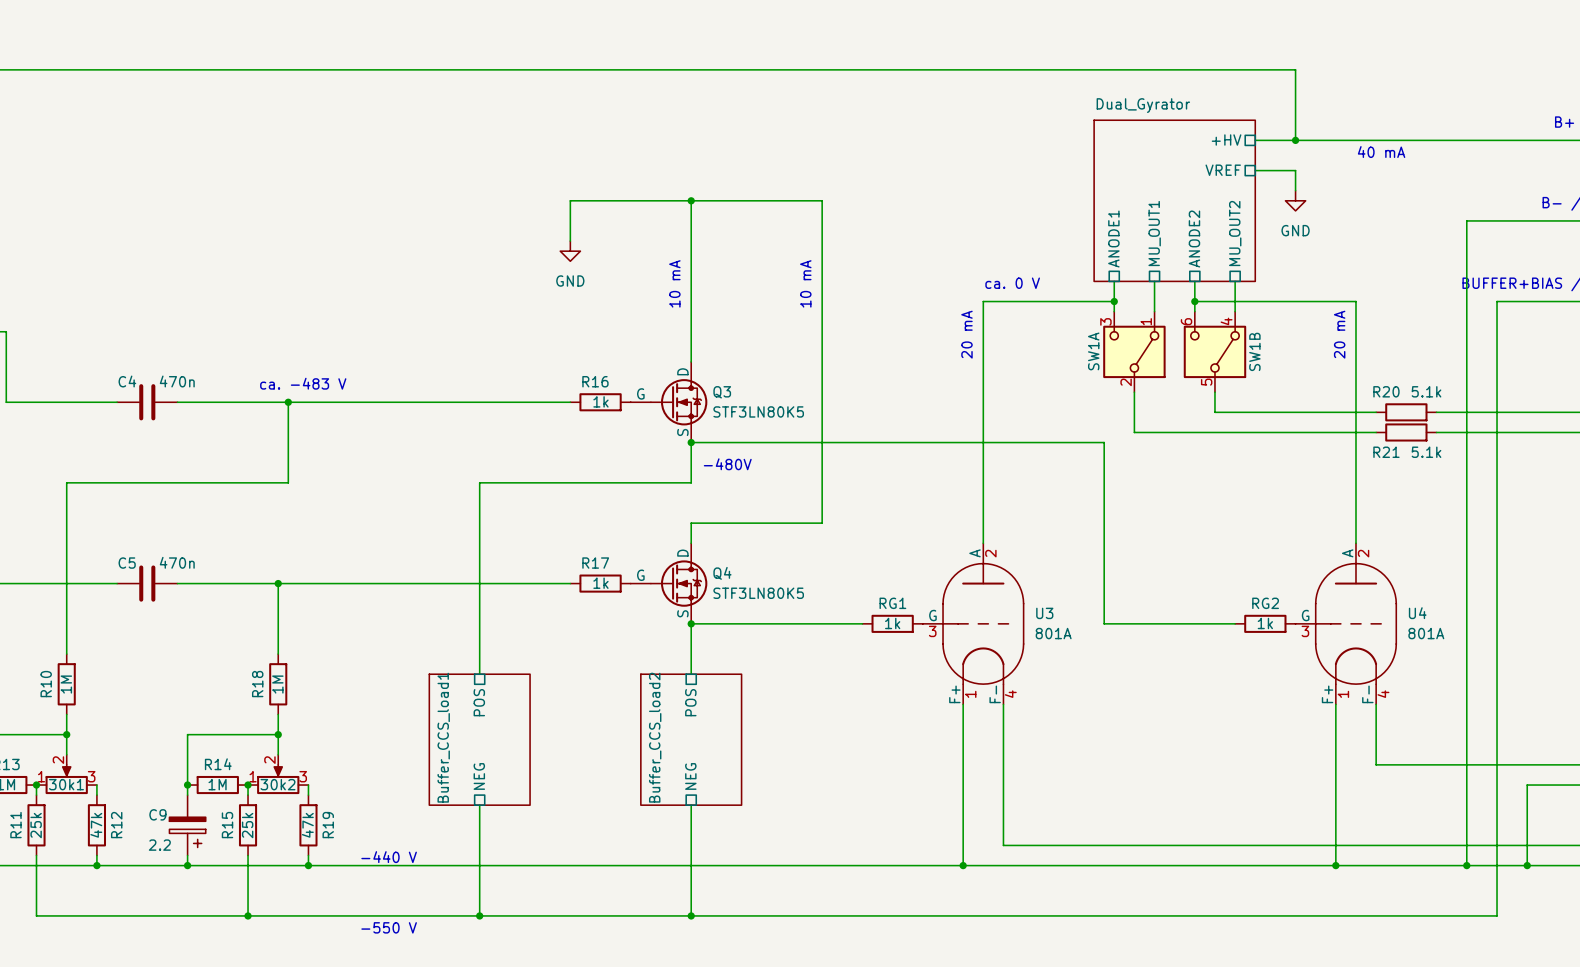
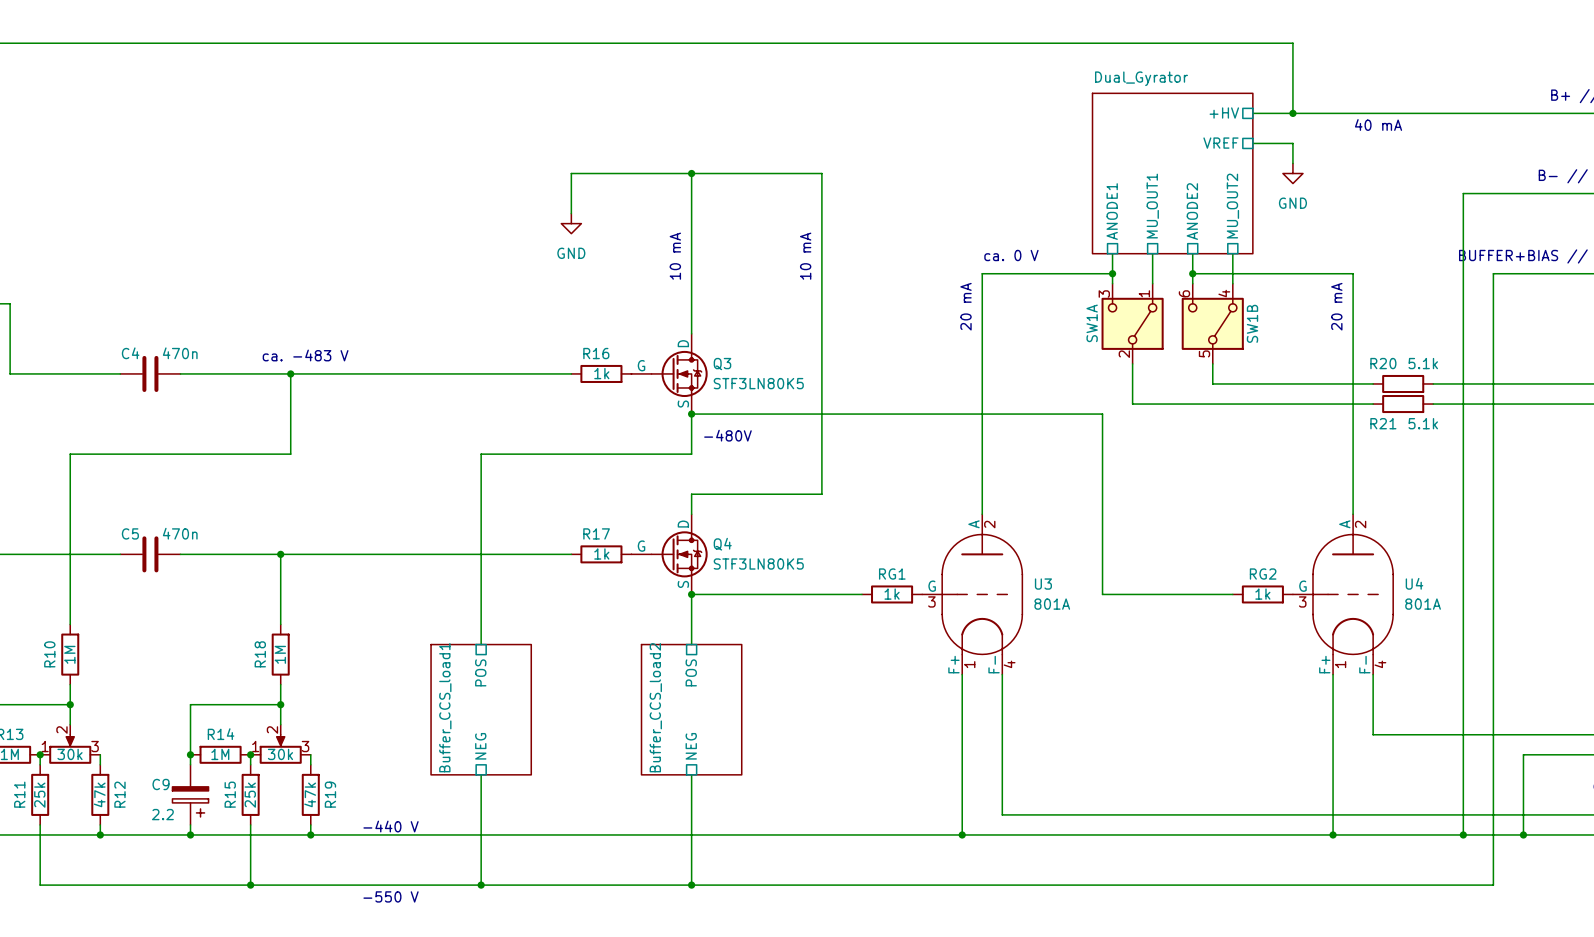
30k1 name: 30k1 (66, 784) -> 30k (70, 754)
30k2 name: 30k2 (278, 784) -> 30k (280, 754)

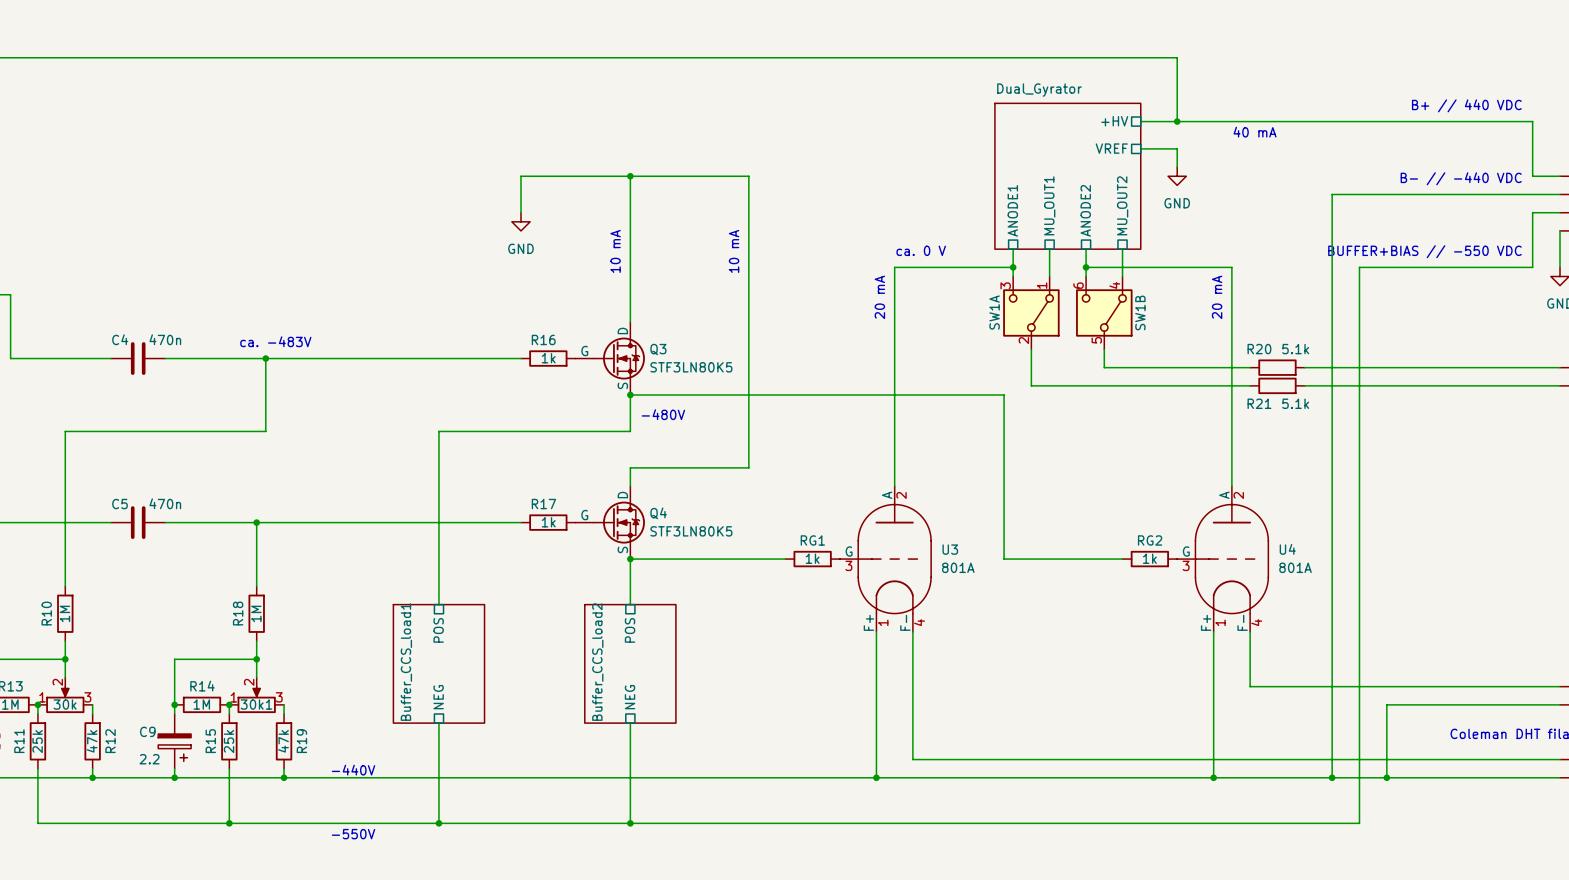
text: ca. -483 V (305, 355) -> ca. -483V (275, 341)
30k name: 30k (280, 754) -> 30k1 (256, 704)
text: -440 V (391, 826) -> -440V (353, 770)
text: -550 V (391, 896) -> -550V (353, 834)

